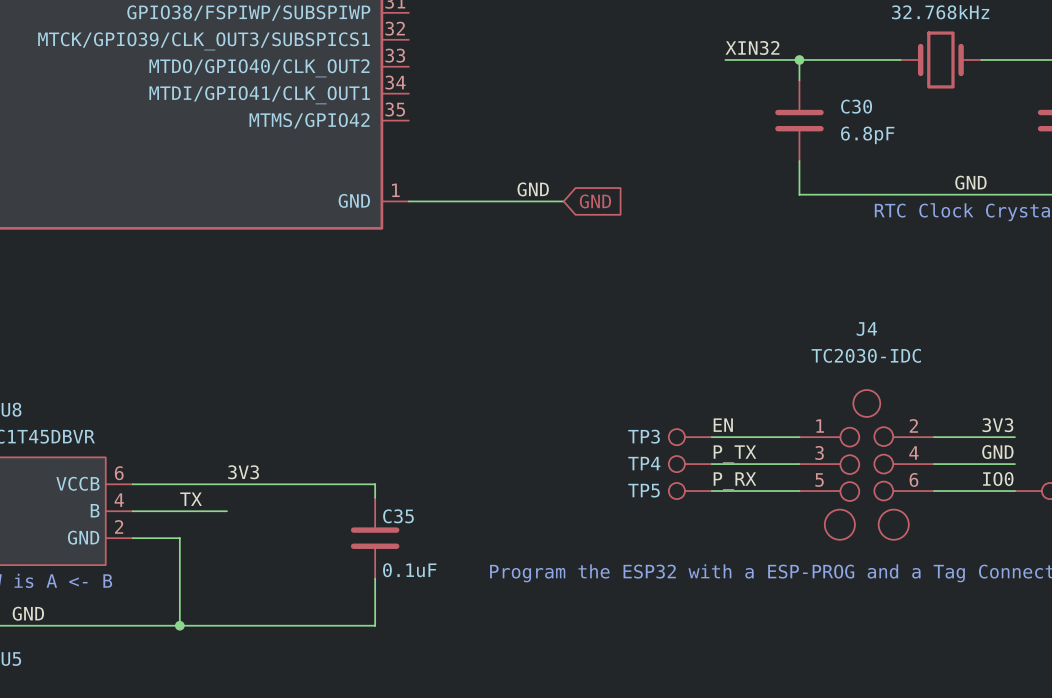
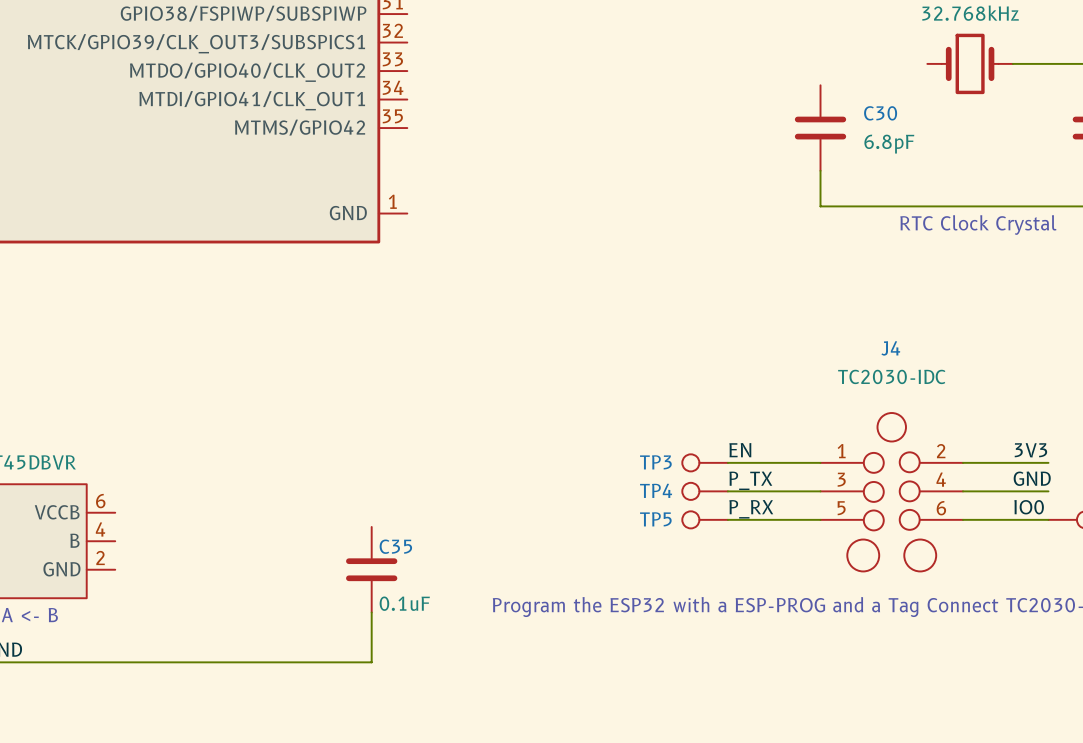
label: XIN32 (752, 47) -> none
wire: (725, 59) (900, 59) -> none
wire: (799, 59) (799, 80) -> none
junction: (799, 59) -> none
label: GND (970, 182) -> none
label: GND (533, 189) -> none
wire: (408, 201) (563, 201) -> none
global label: GND (595, 201) -> none
label: 3V3 (243, 472) -> none
wire: (132, 484) (375, 484) (375, 497) -> none
label: TX (191, 499) -> none
wire: (132, 511) (226, 511) -> none
wire: (132, 538) (179, 538) (179, 625) -> none
junction: (179, 625) -> none

